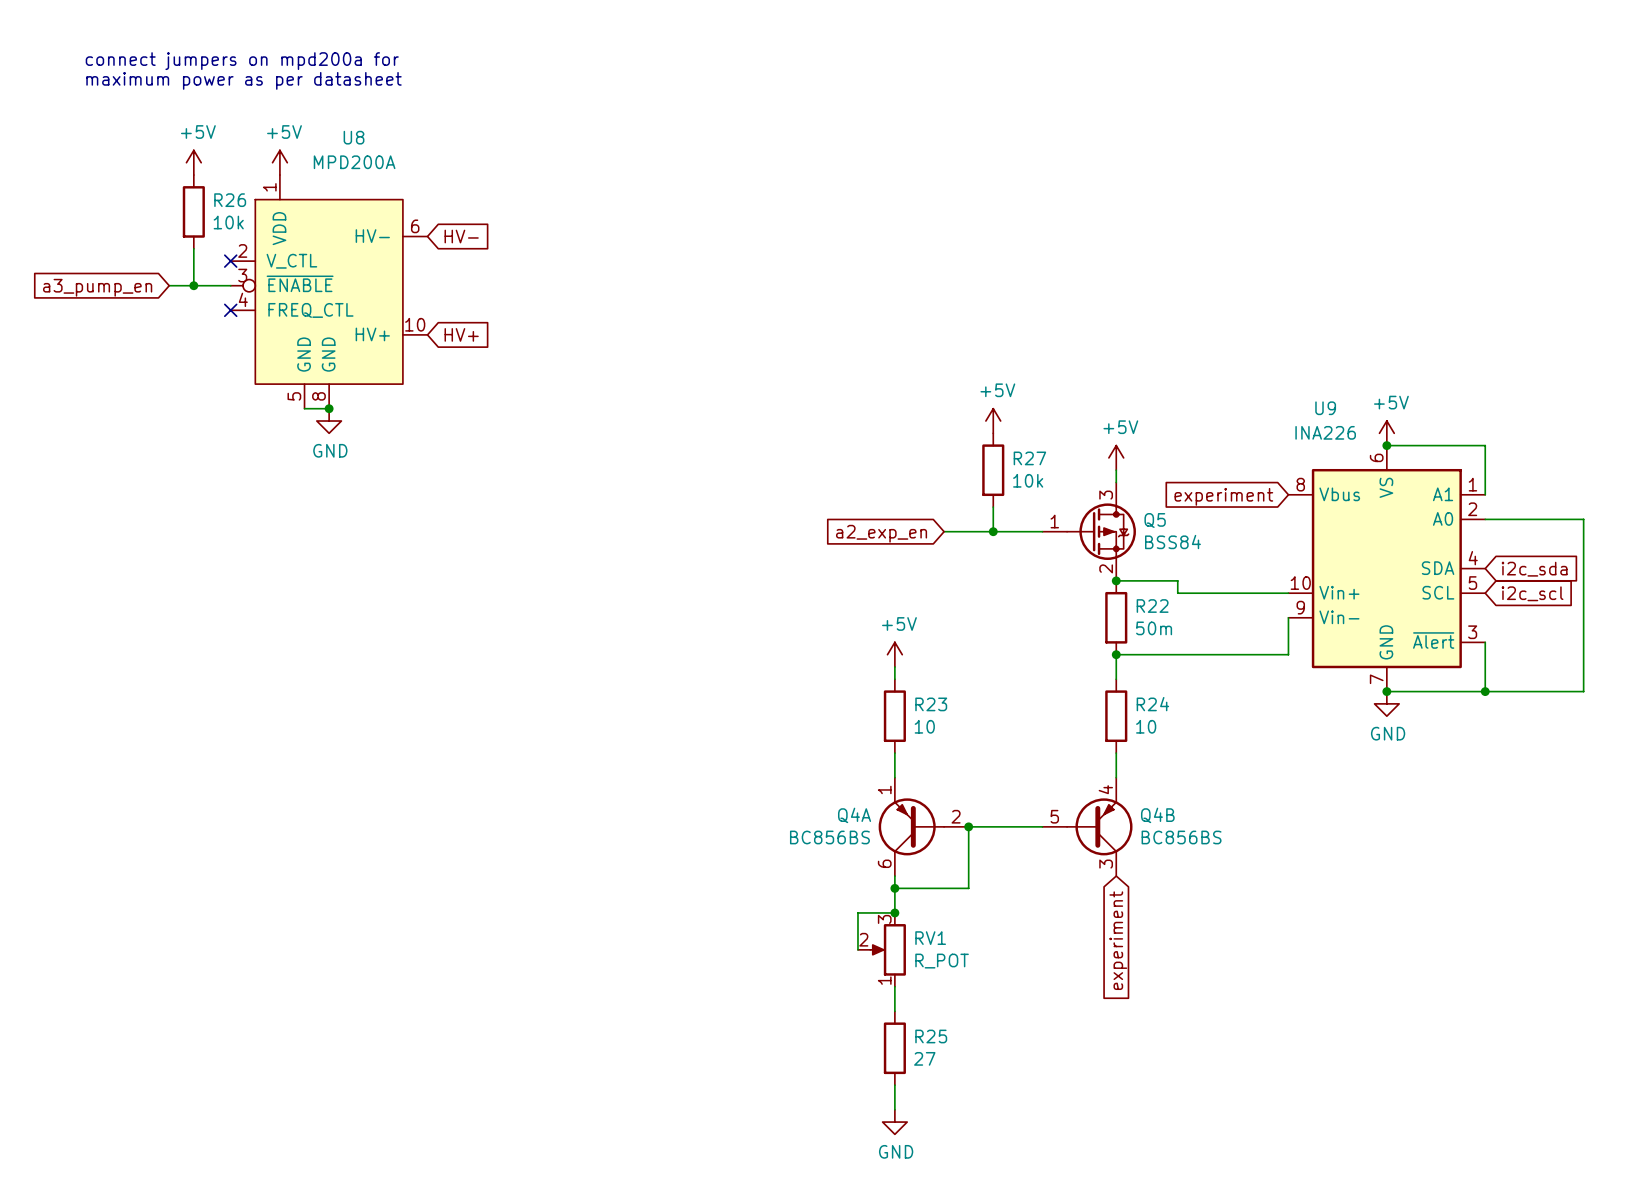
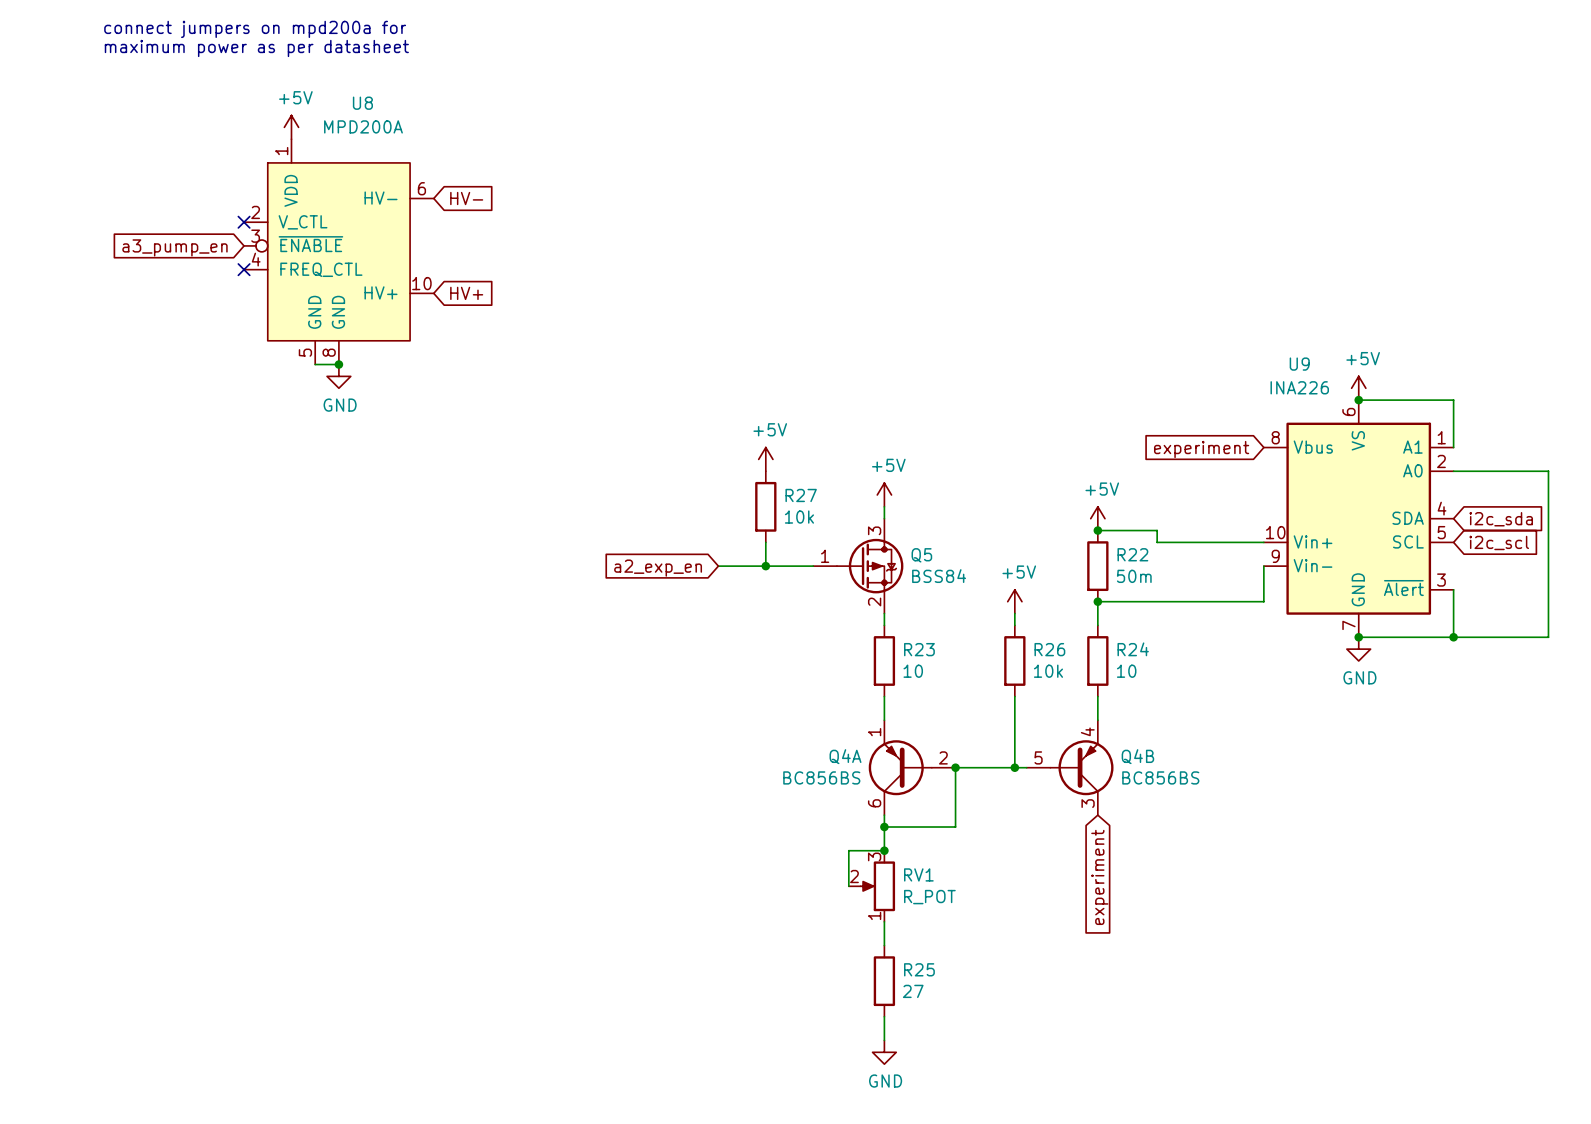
power symbol: +5V (193, 162) -> none
R26 position: (193, 211) -> (1014, 660)
wire: (193, 248) (193, 285) -> none
wire: (169, 285) (230, 285) -> none
junction: (193, 285) -> none
global label position: a3_pump_en (97, 287) -> a3_pump_en (174, 247)
power symbol: +5V (993, 421) -> none
power symbol: +5V (1116, 457) -> none
R27 position: (993, 470) -> (765, 506)
wire: (1116, 470) (1116, 482) -> (884, 506) (884, 518)
power symbol: none -> +5V (765, 459)
wire: (993, 507) (993, 531) -> (765, 542) (765, 566)
wire: (944, 531) (1042, 531) -> (718, 566) (813, 566)
junction: (993, 531) -> none
Q5 position: (1089, 531) -> (858, 566)
global label position: a2_exp_en (881, 533) -> a2_exp_en (658, 568)
power symbol: none -> +5V (884, 494)
power symbol: none -> +5V (1097, 518)
junction: none -> (765, 566)
power symbol: +5V (894, 654) -> none
power symbol: none -> +5V (1014, 601)
wire: none -> (1014, 613) (1014, 625)
wire: none -> (1014, 696) (1014, 767)
junction: none -> (1014, 767)

